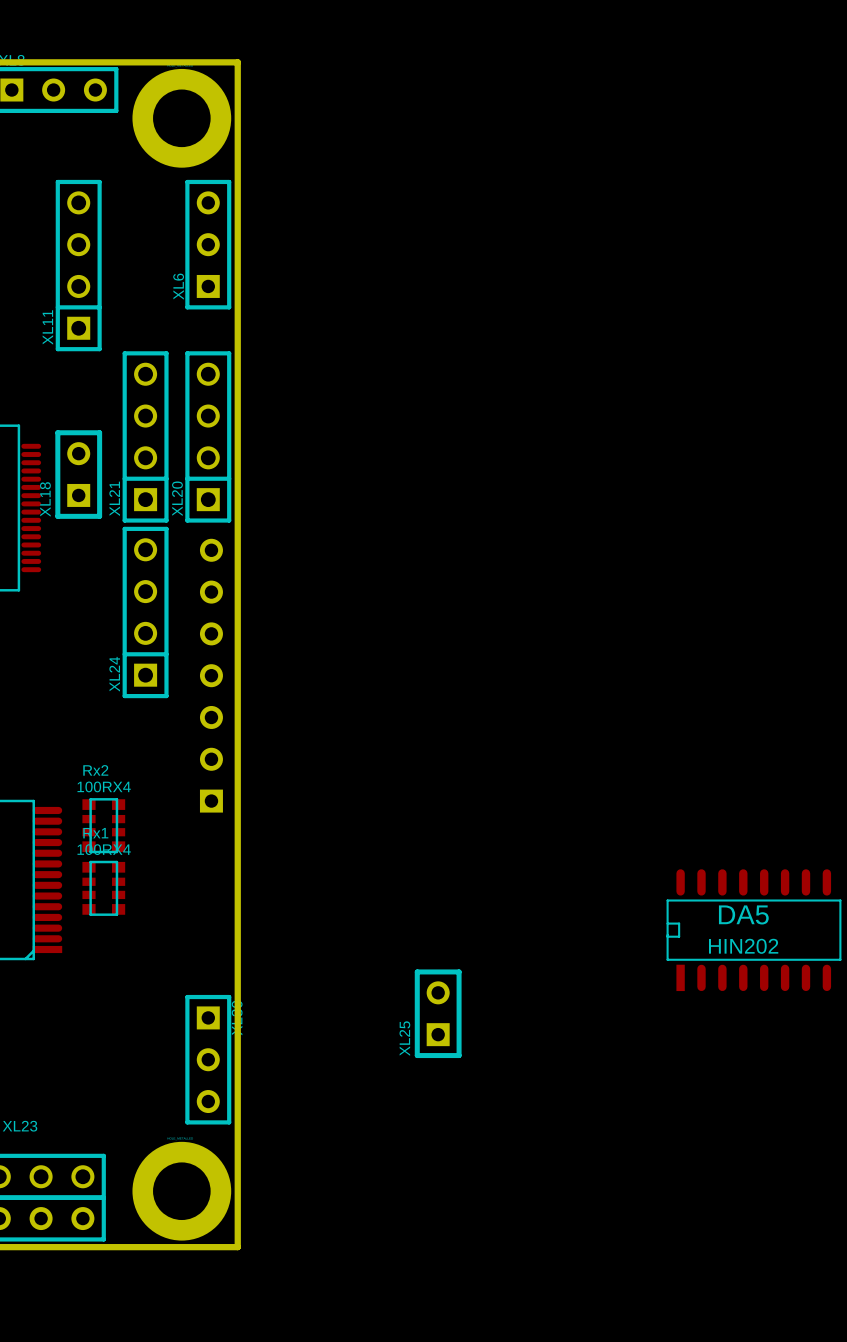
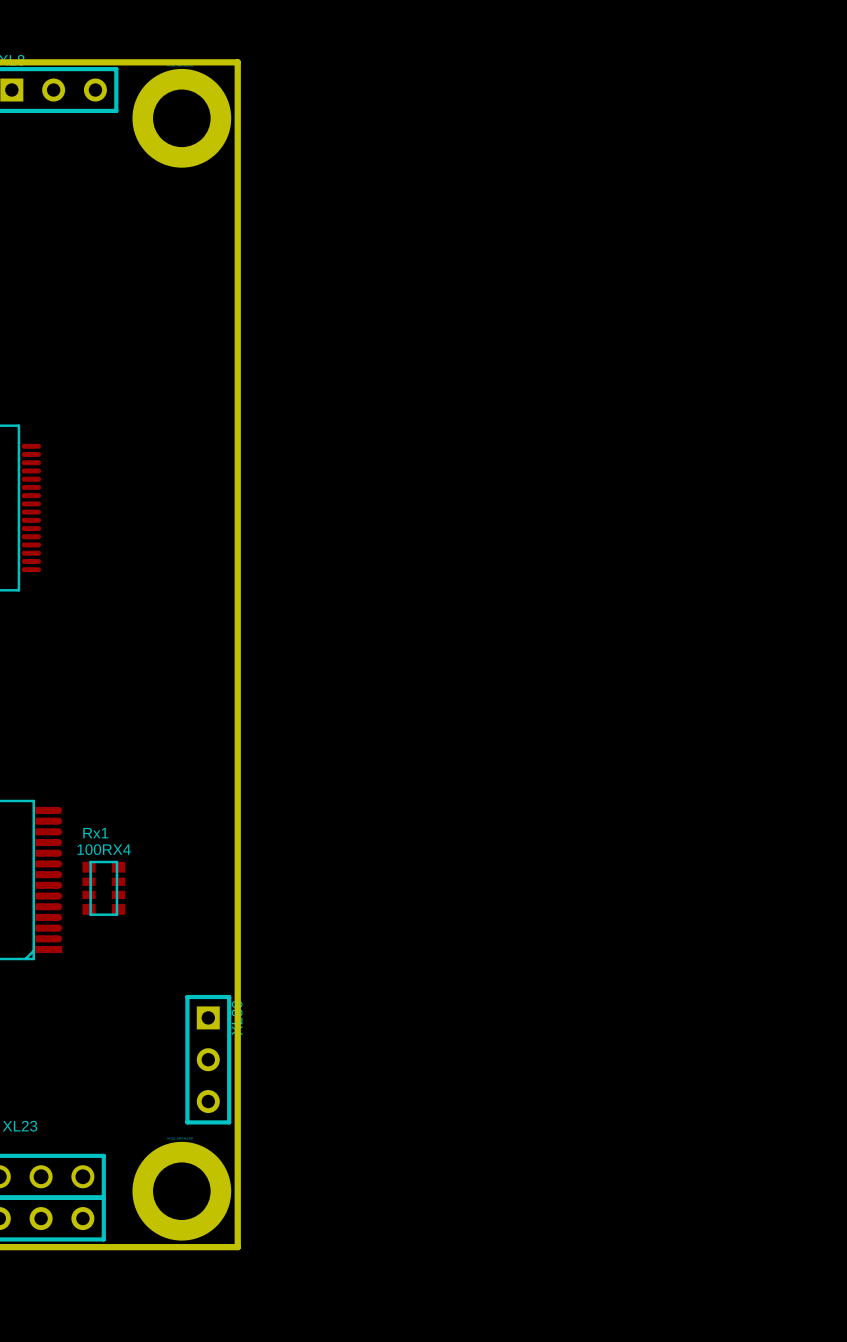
XL6: (208, 244) -> none
XL11: (78, 265) -> none
XL21: (145, 436) -> none
XL20: (208, 436) -> none
XL18: (78, 474) -> none
XL24: (145, 612) -> none
part: (211, 675) -> none
Rx2: 100RX4 (103, 825) -> none
DA5: HIN202 (754, 930) -> none
XL25: (438, 1013) -> none

